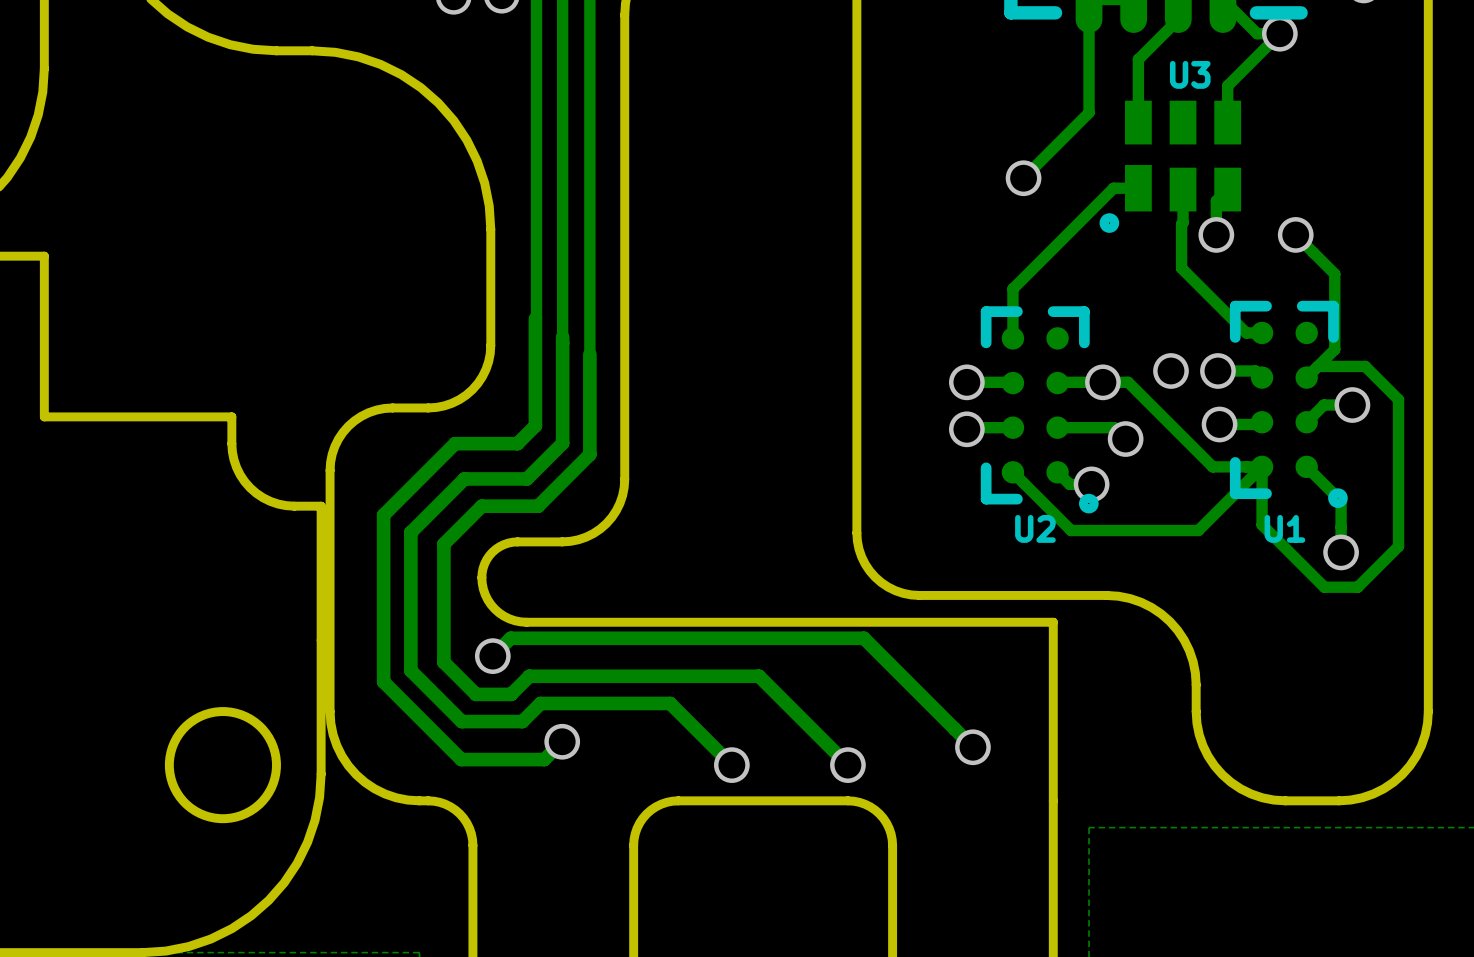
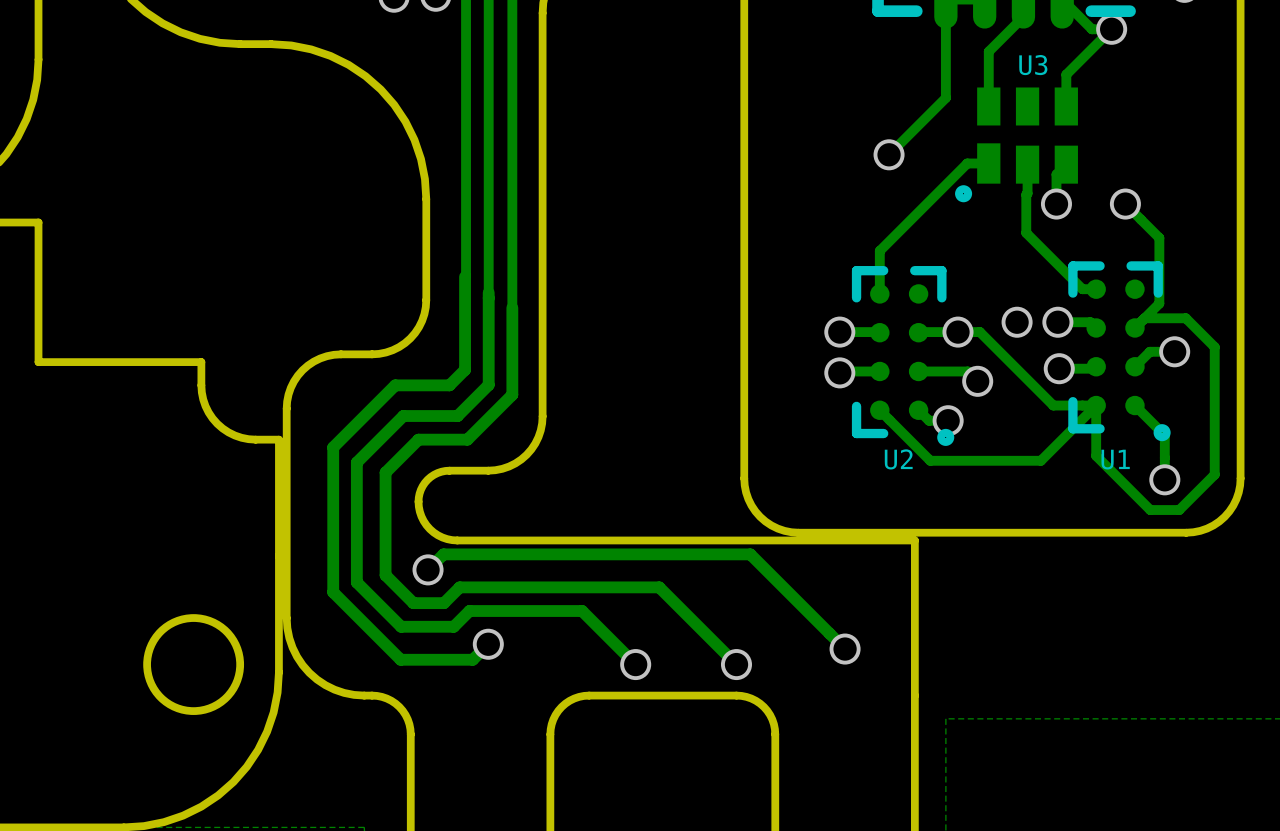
board edge: (856, 532) (859, 549) (869, 571) (888, 587) (903, 593) (919, 595) (1106, 595) (1129, 598) (1151, 607) (1170, 621) (1177, 630) (1189, 650) (1195, 673) (1196, 711) (1199, 734) (1208, 756) (1214, 765) (1231, 782) (1251, 794) (1273, 800) (1285, 800) (1350, 800) (1373, 794) (1393, 782) (1402, 774) (1416, 756) (1425, 734) (1428, 711) (1428, 550) -> (744, 462) (746, 492) (755, 511) (765, 521) (777, 528) (798, 532) (1193, 532) (1207, 528) (1224, 516) (1236, 499) (1240, 478)

